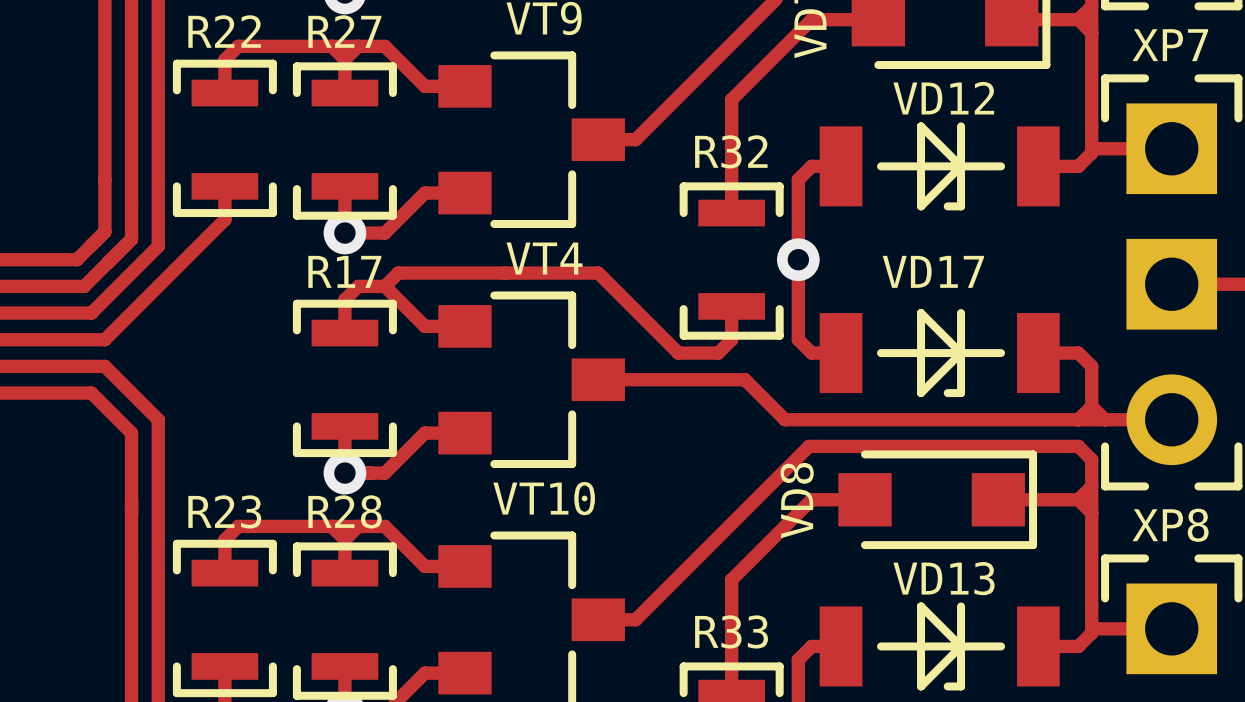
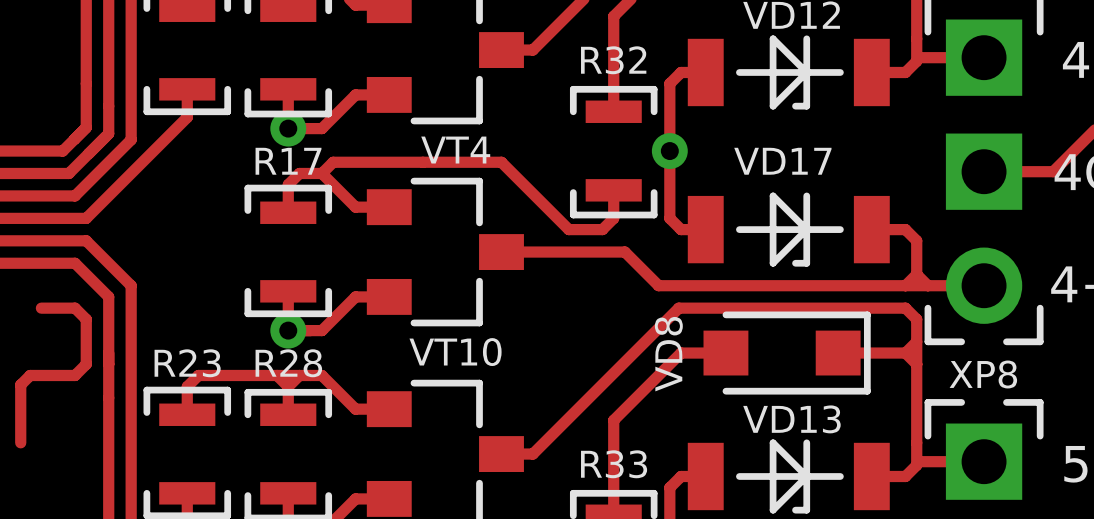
track: none -> (41, 308) (75, 308) (86, 319) (86, 364) (75, 375) (30, 375) (20, 384) (20, 442)

